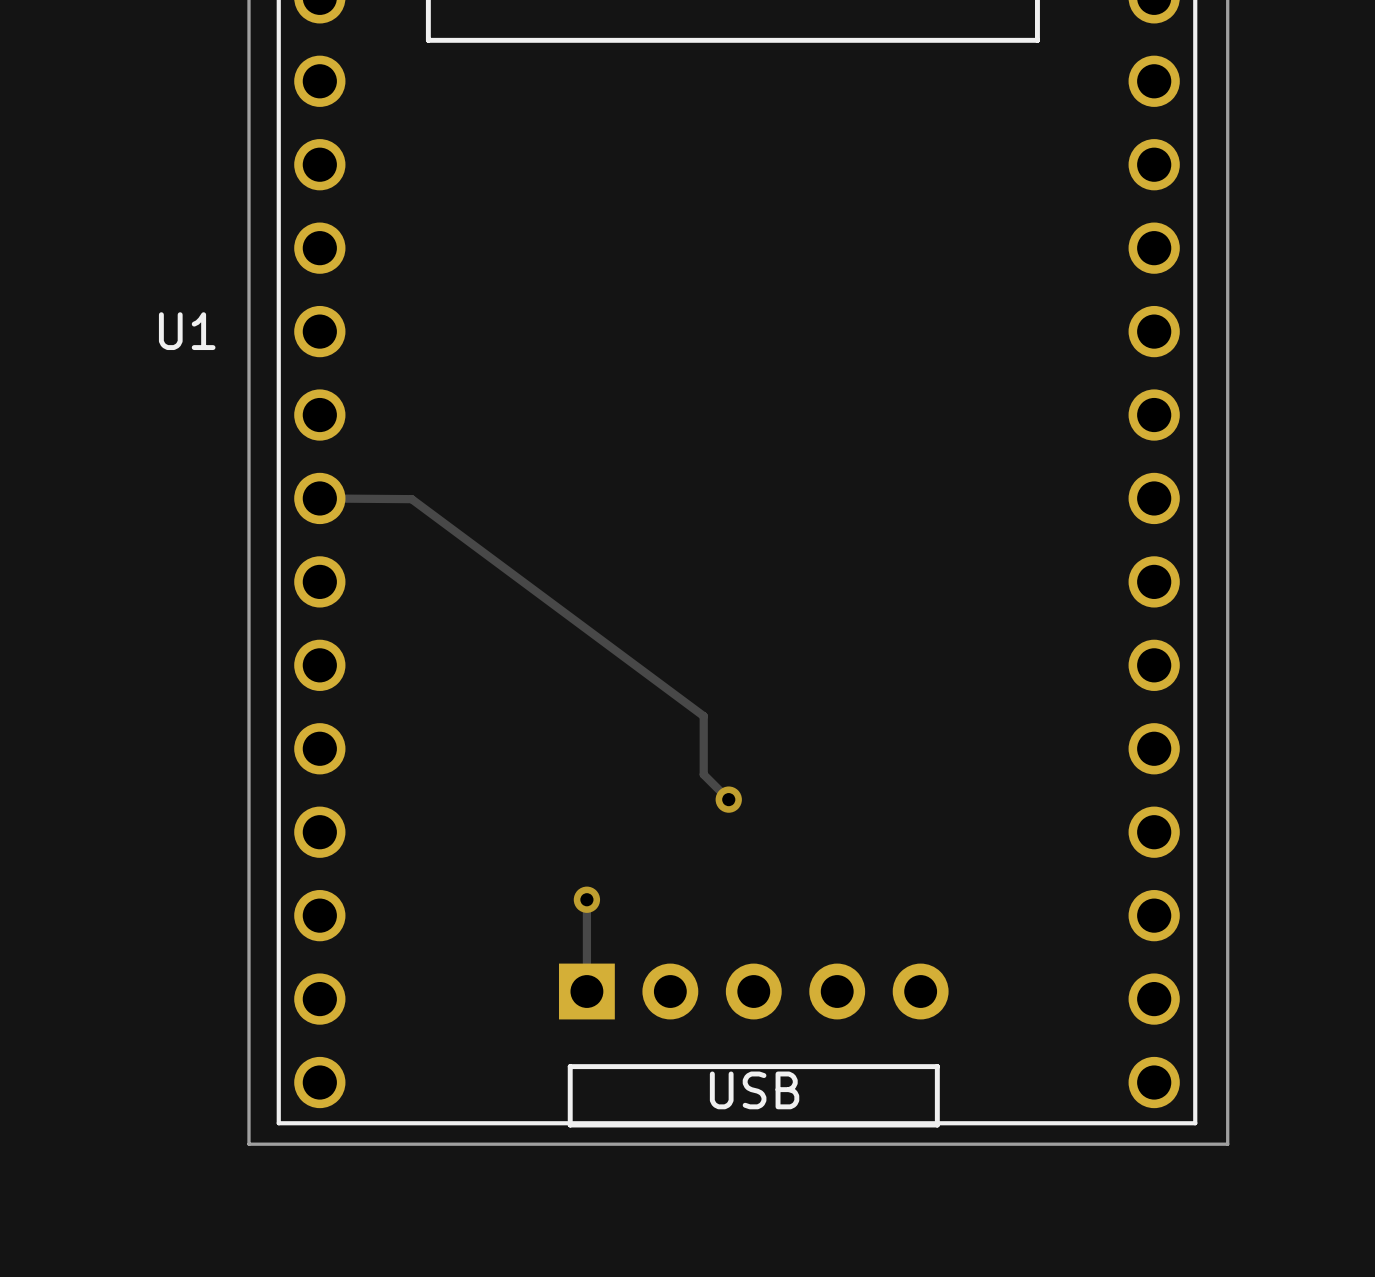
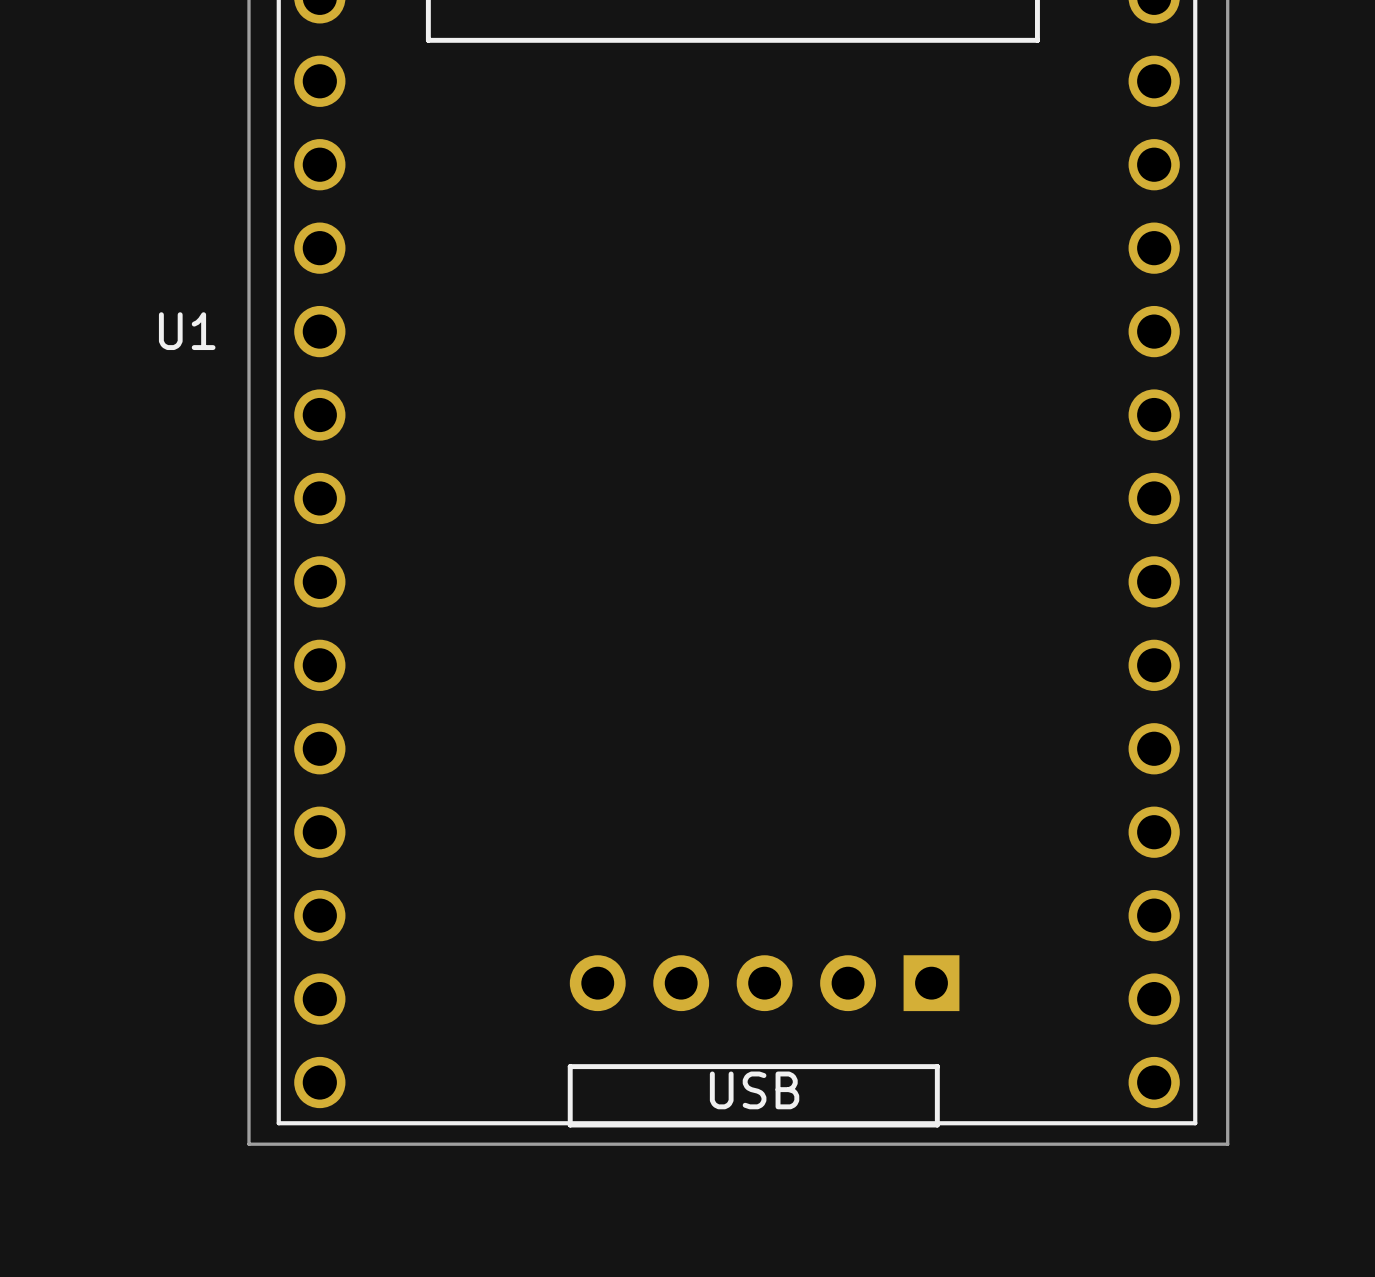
track: (319, 498) (411, 499) (703, 716) (703, 774) (728, 799) -> none
via: (728, 799) -> none
track: (586, 899) (586, 991) -> none
via: (586, 899) -> none
part rotation: 0° (753, 991) -> 180° (764, 983)

